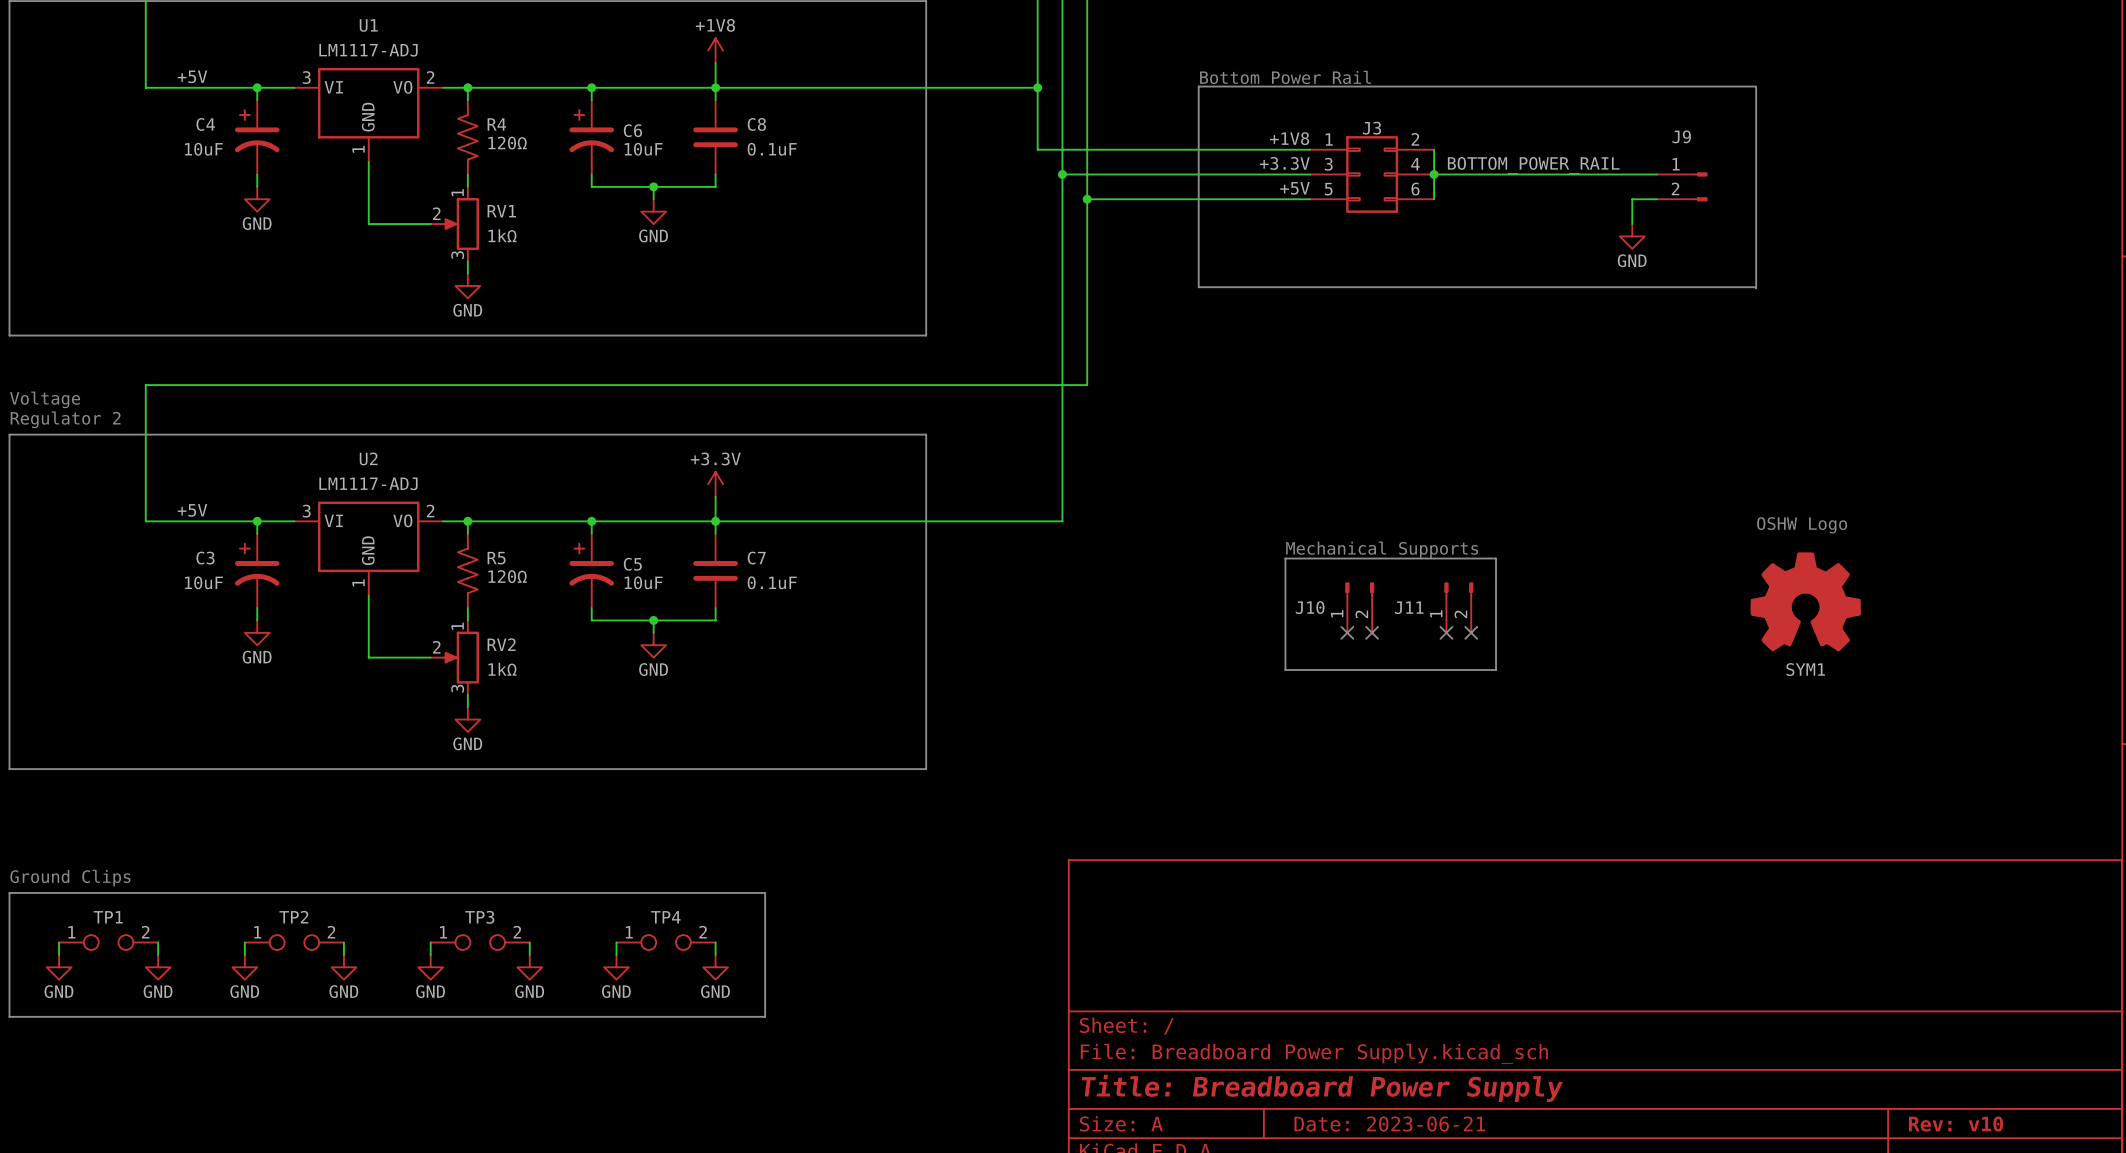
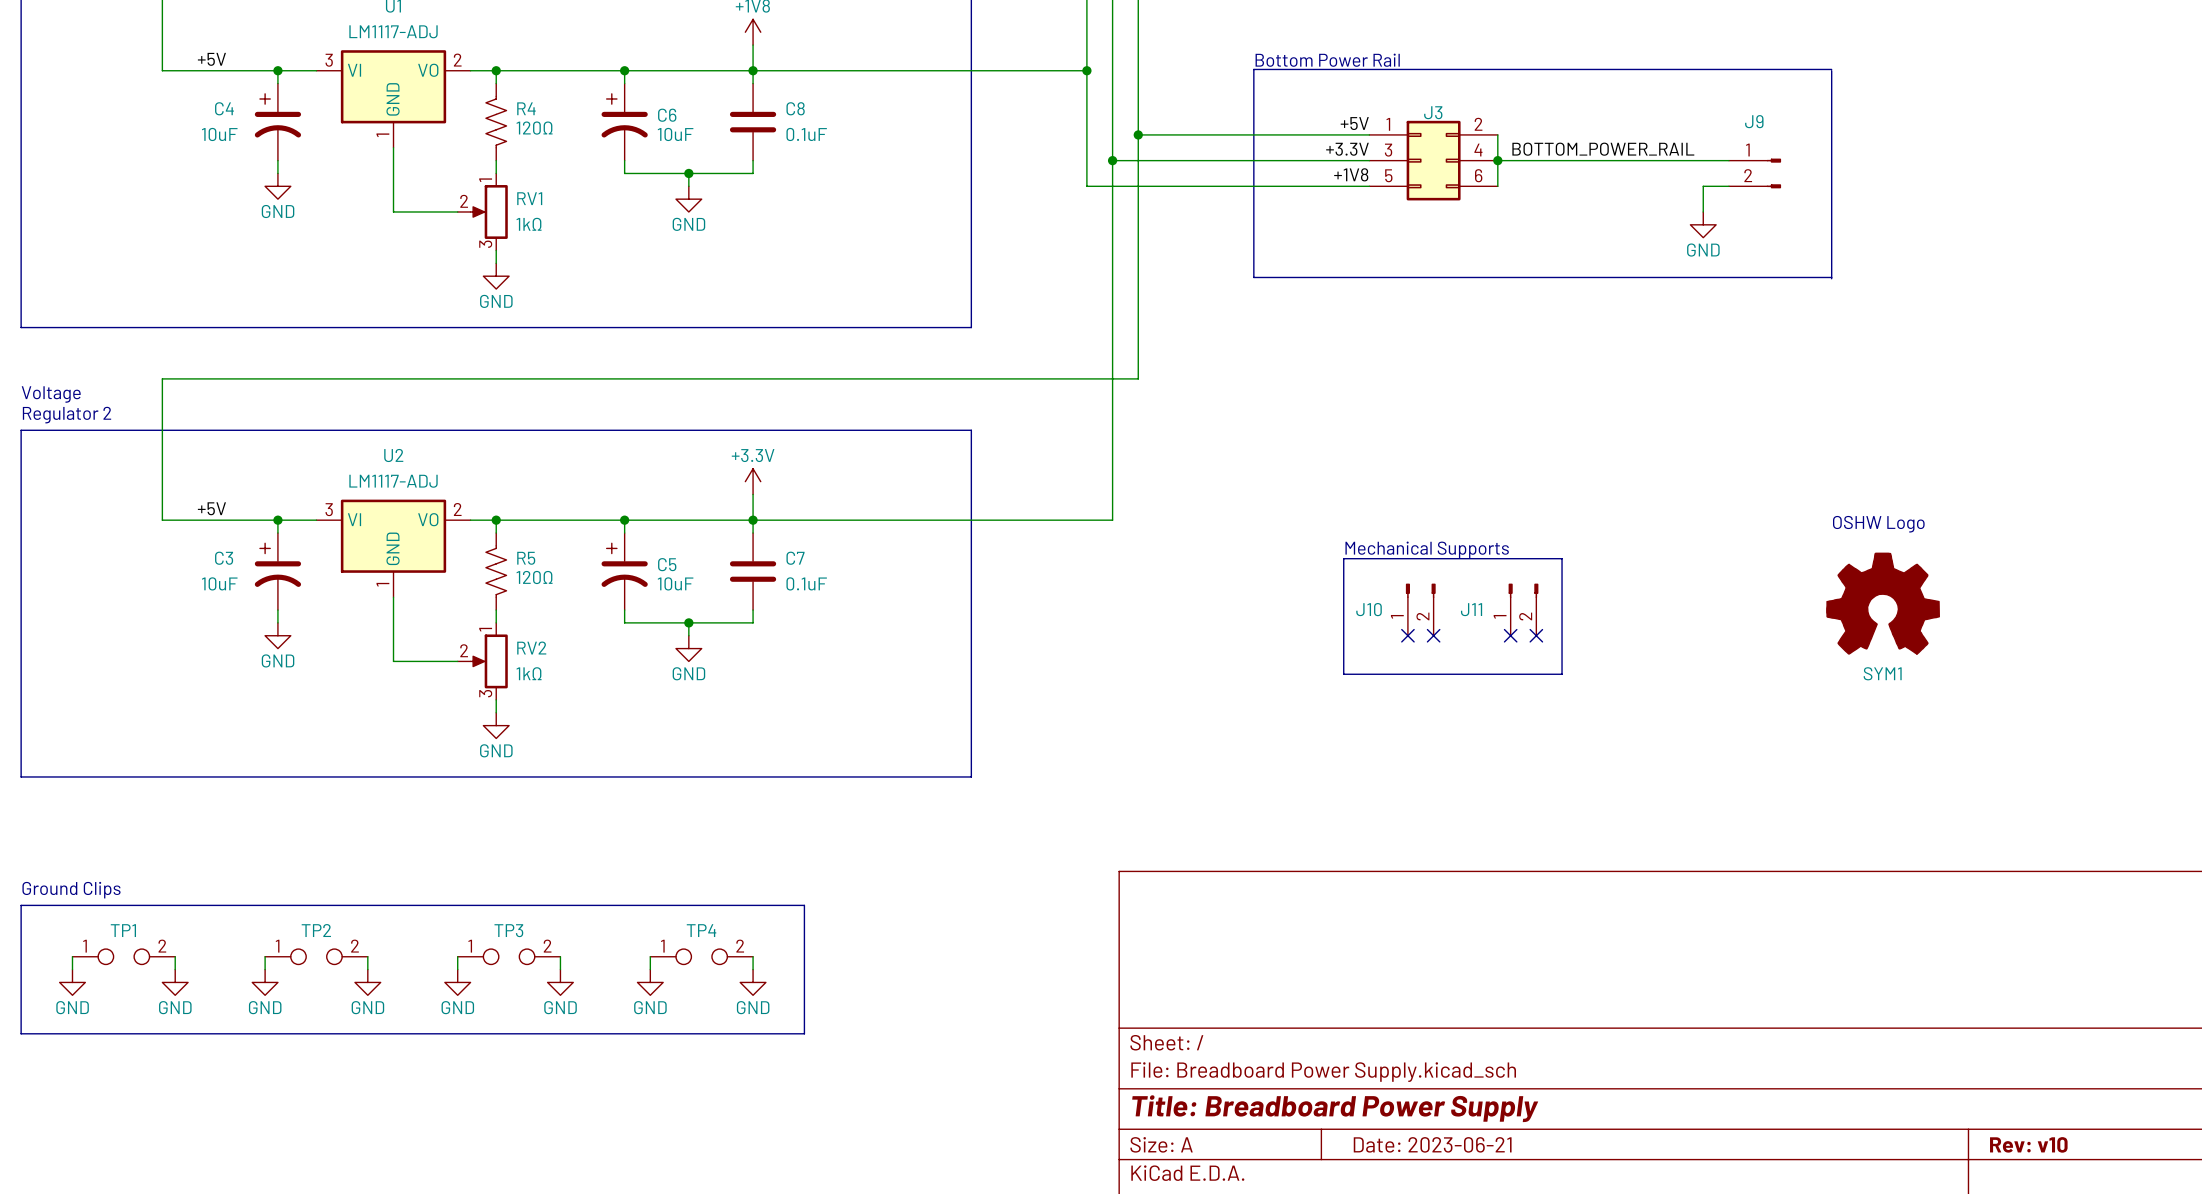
label: +1V8 (1289, 138) -> +5V (1354, 123)
wire: (1037, 149) (1087, 149) -> (1086, 134) (1086, 186) (1138, 186)
label: +5V (1294, 188) -> +1V8 (1351, 174)
junction position: (1087, 199) -> (1138, 134)

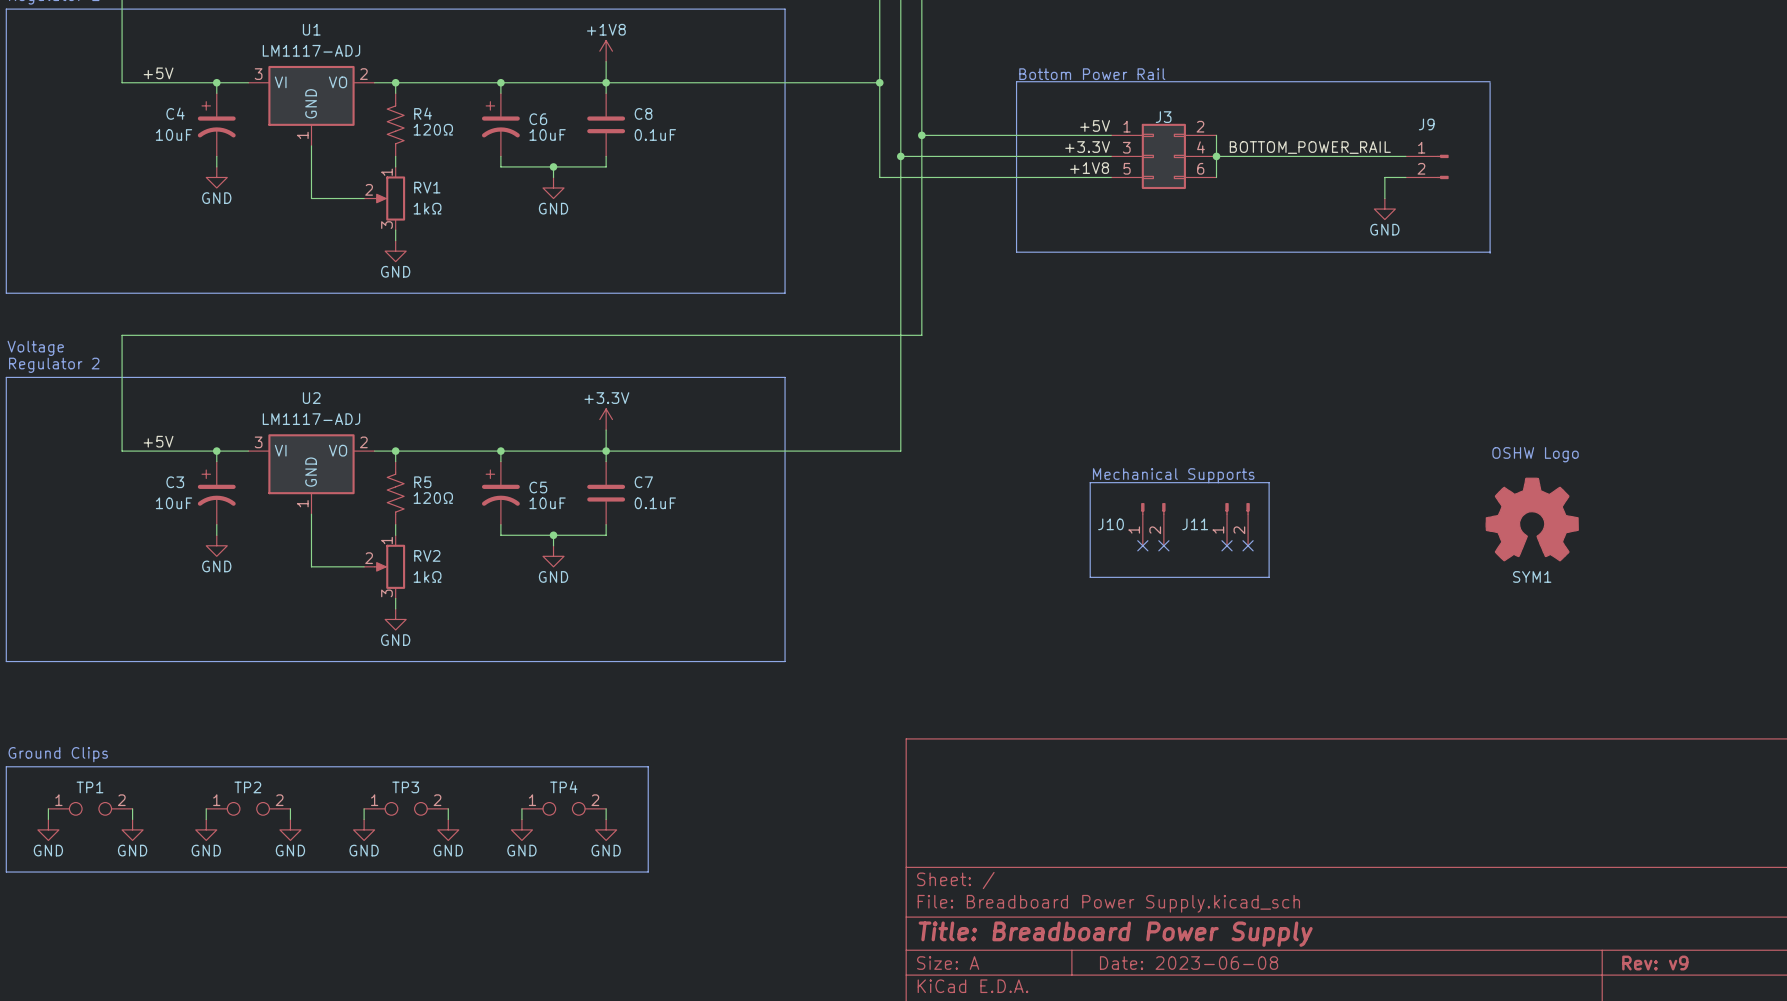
title block: Date: 2023-06-21 (1432, 1144) -> Date: 2023-06-08 (1189, 963)
title block: Rev: v10 (2028, 1144) -> Rev: v9 (1655, 963)

